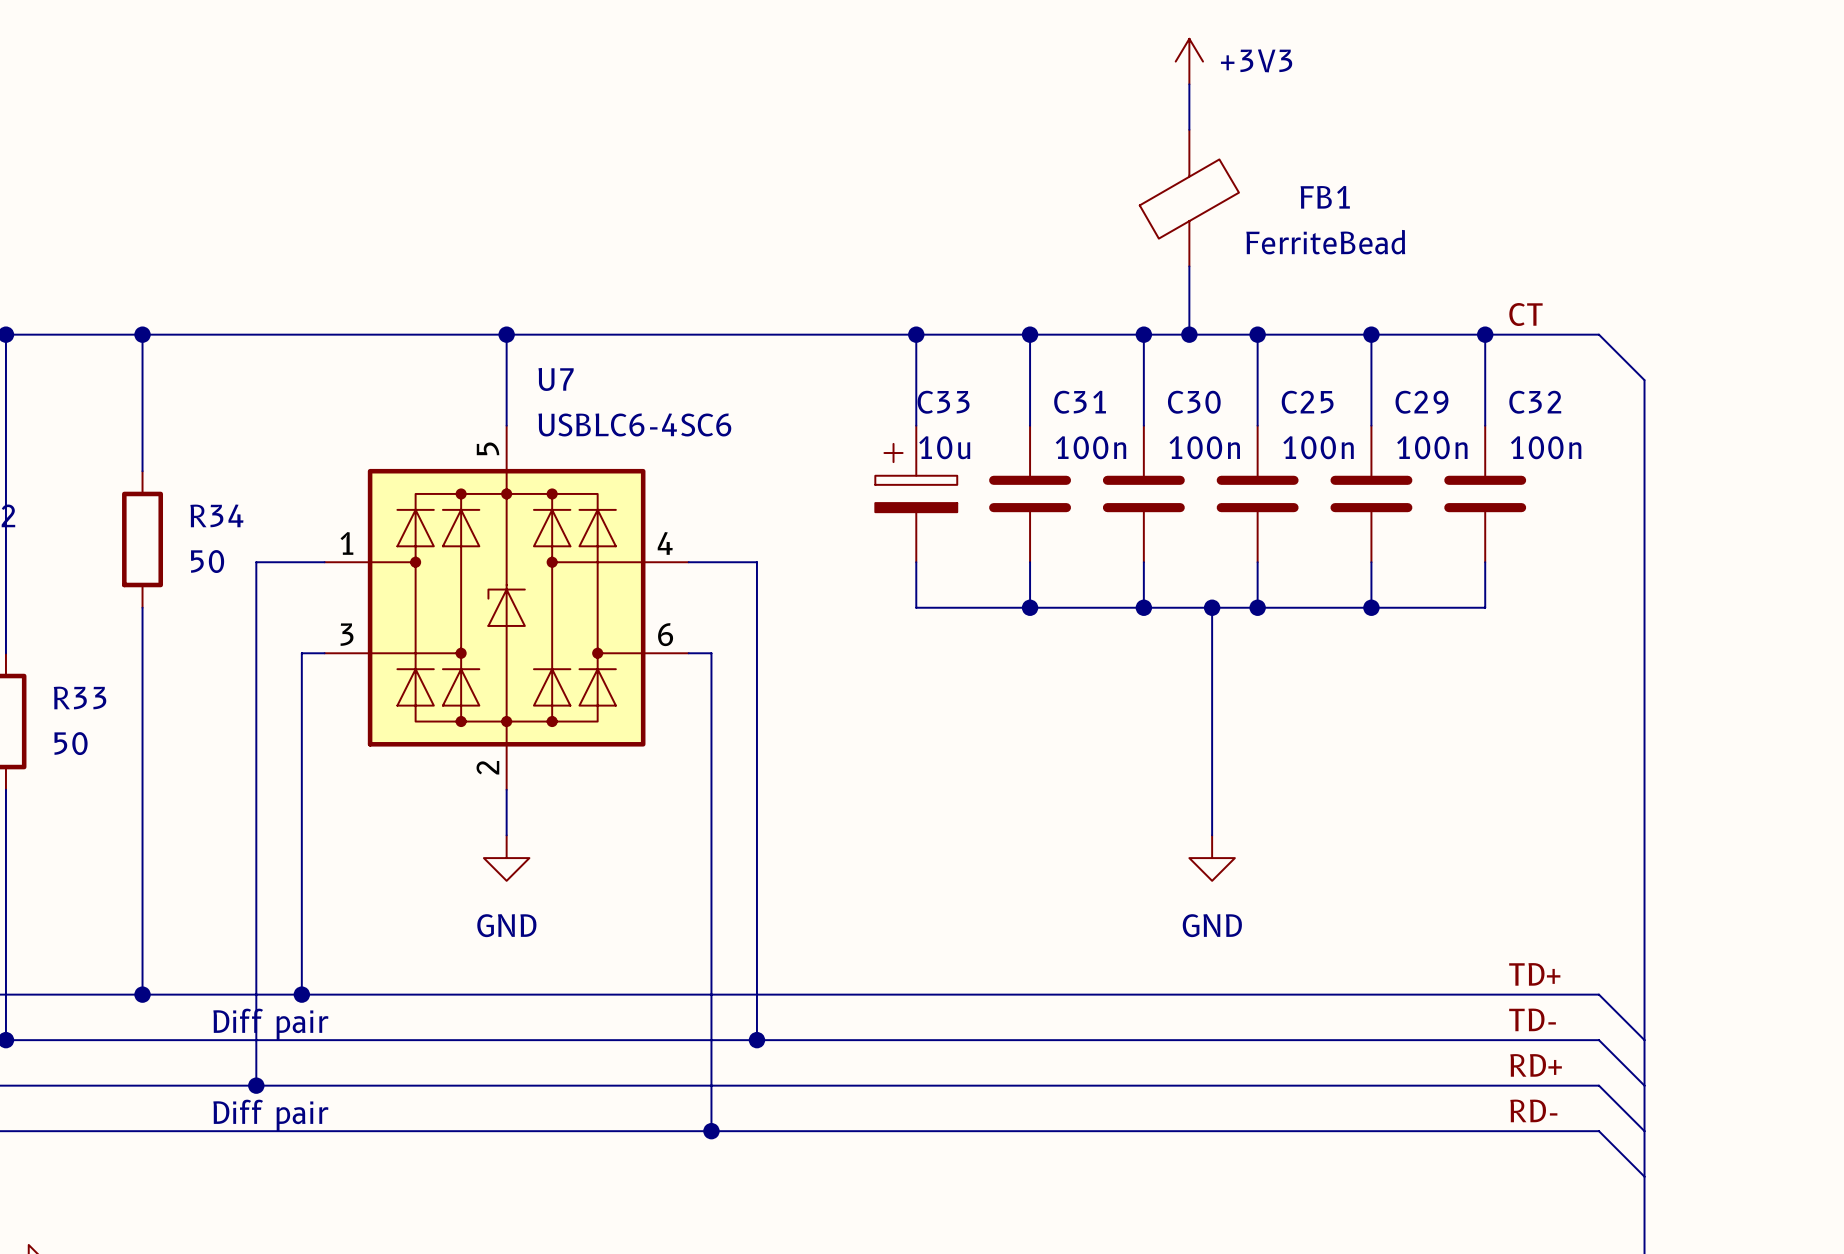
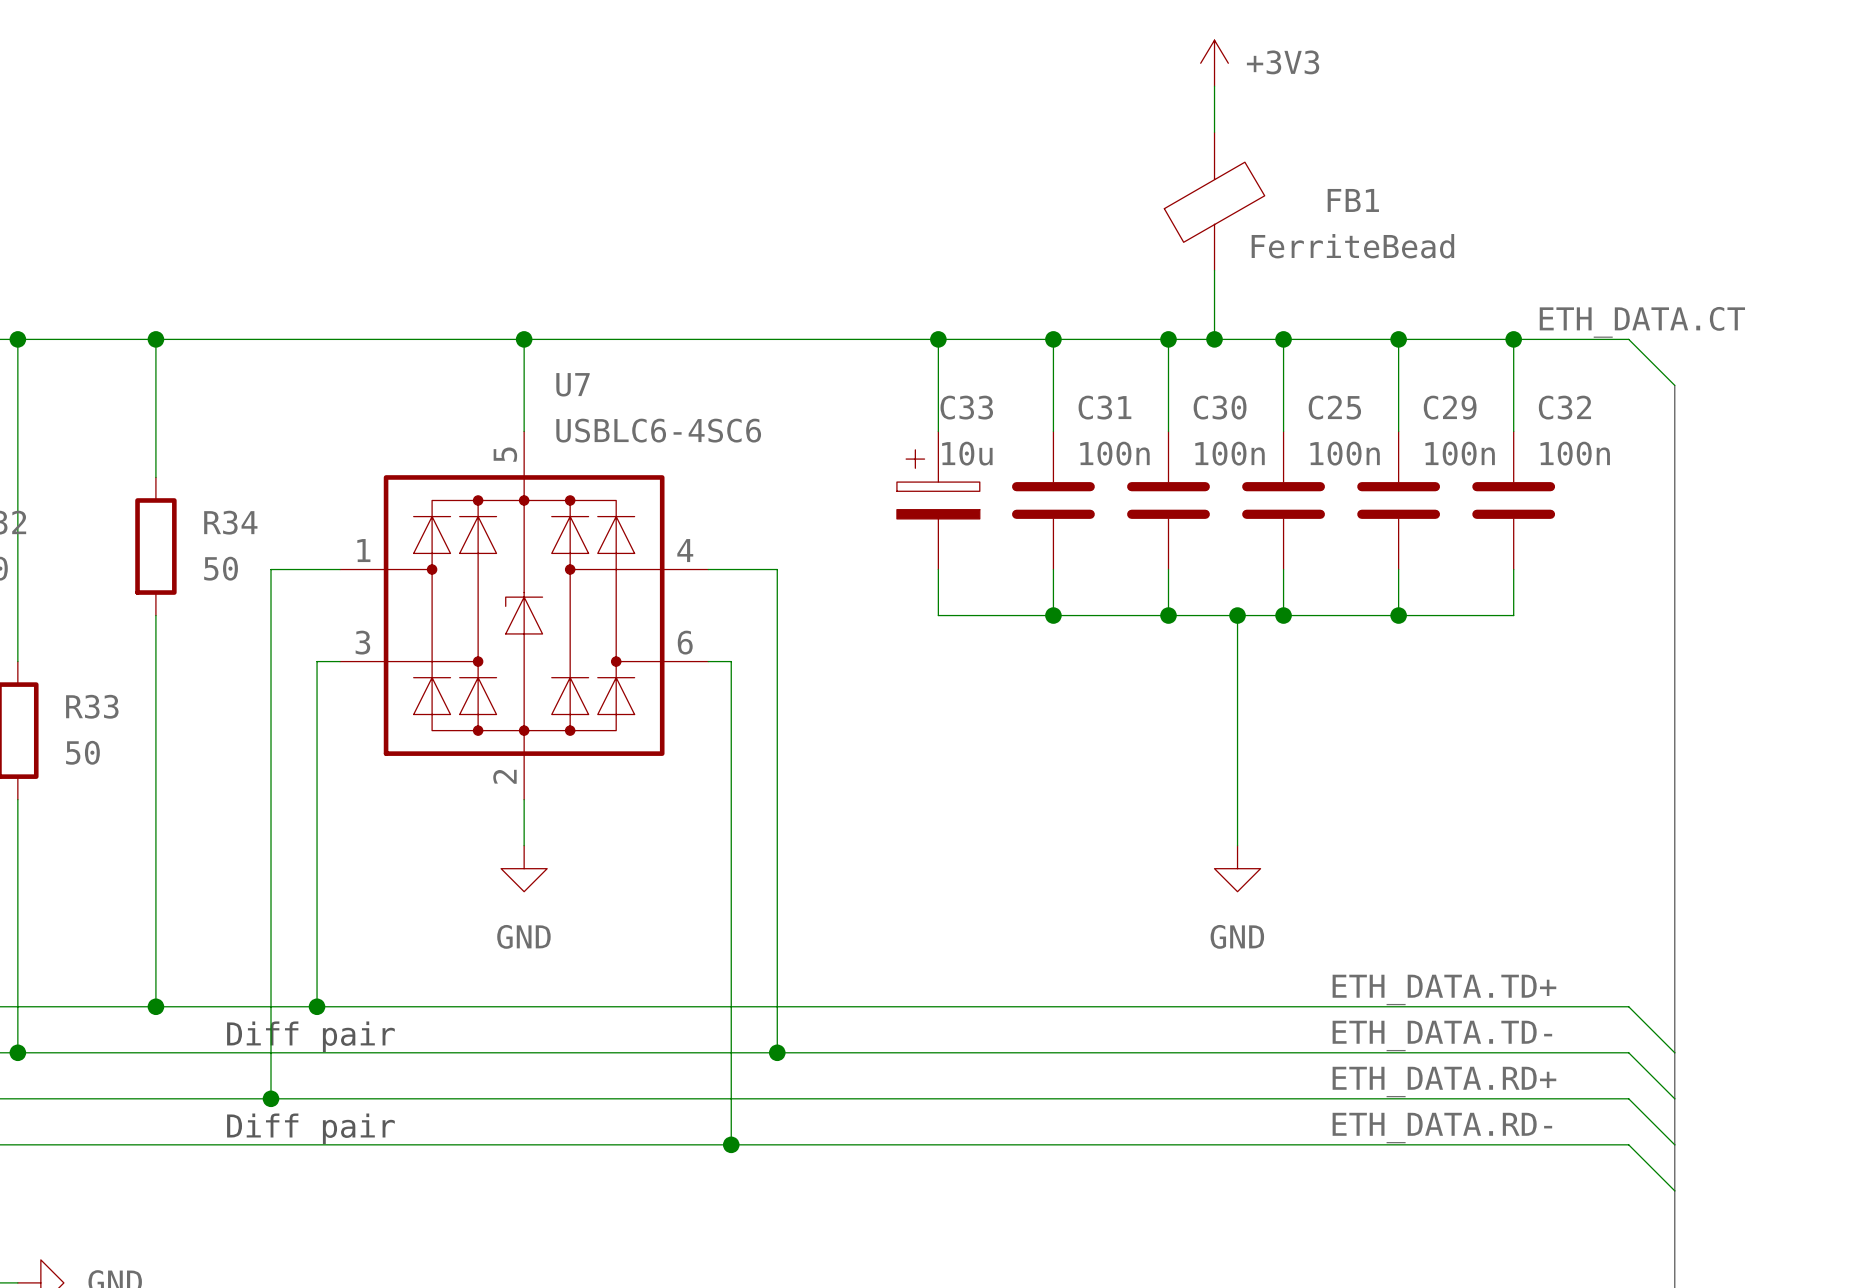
label: CT (1525, 314) -> ETH_DATA.CT (1642, 322)
label: TD+ (1534, 974) -> none
label: none -> ETH_DATA.TD+ (1444, 989)
label: TD- (1532, 1019) -> none
label: none -> ETH_DATA.TD- (1442, 1035)
label: RD+ (1536, 1065) -> none
label: none -> ETH_DATA.RD+ (1444, 1082)
label: RD- (1533, 1110) -> none
label: none -> ETH_DATA.RD- (1442, 1128)

